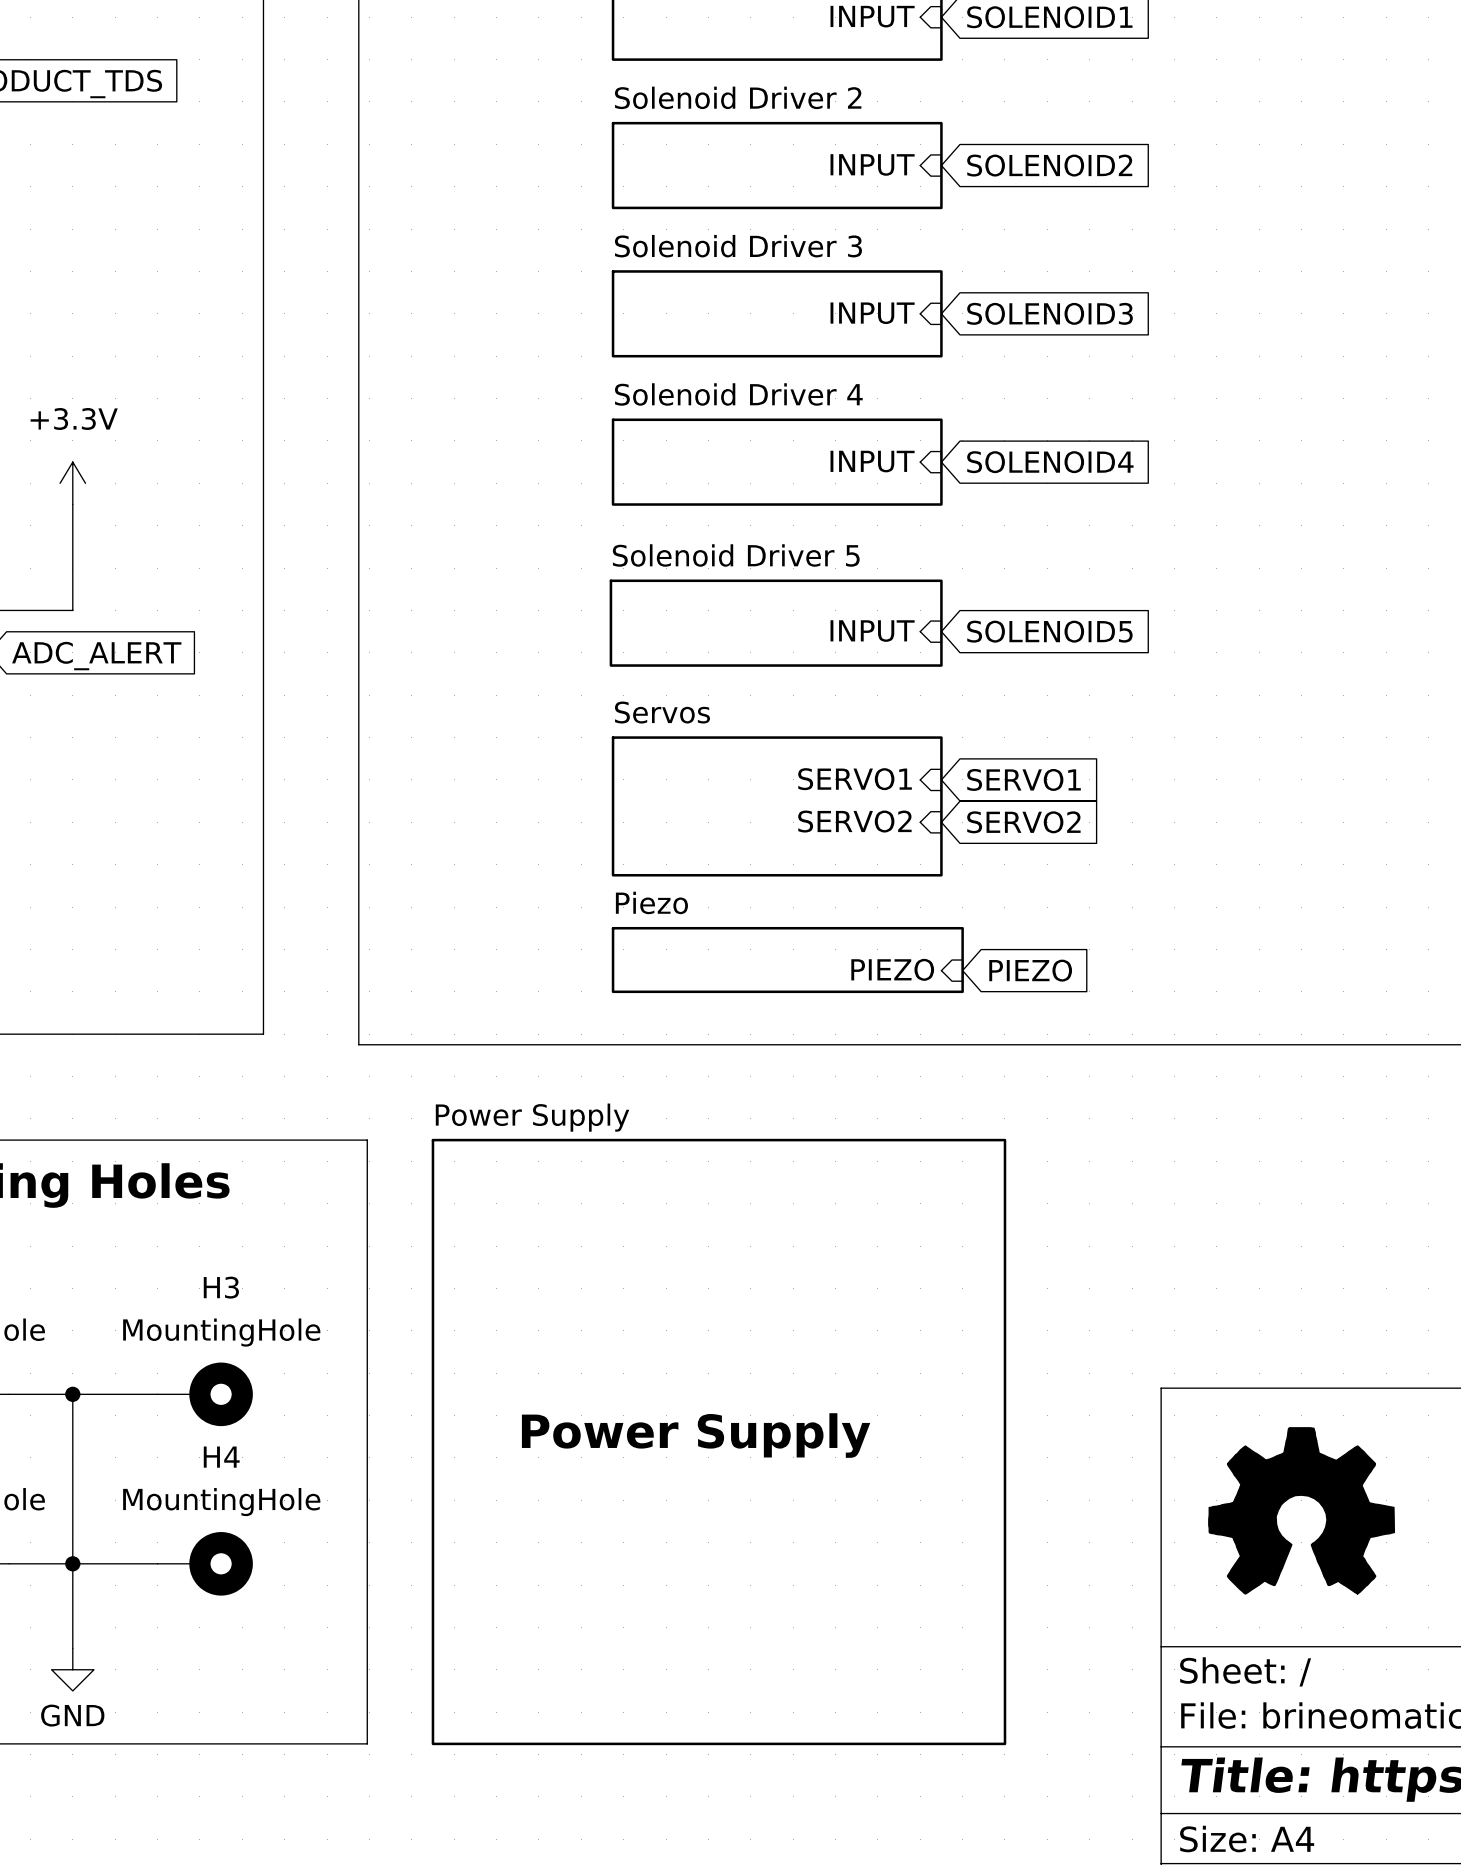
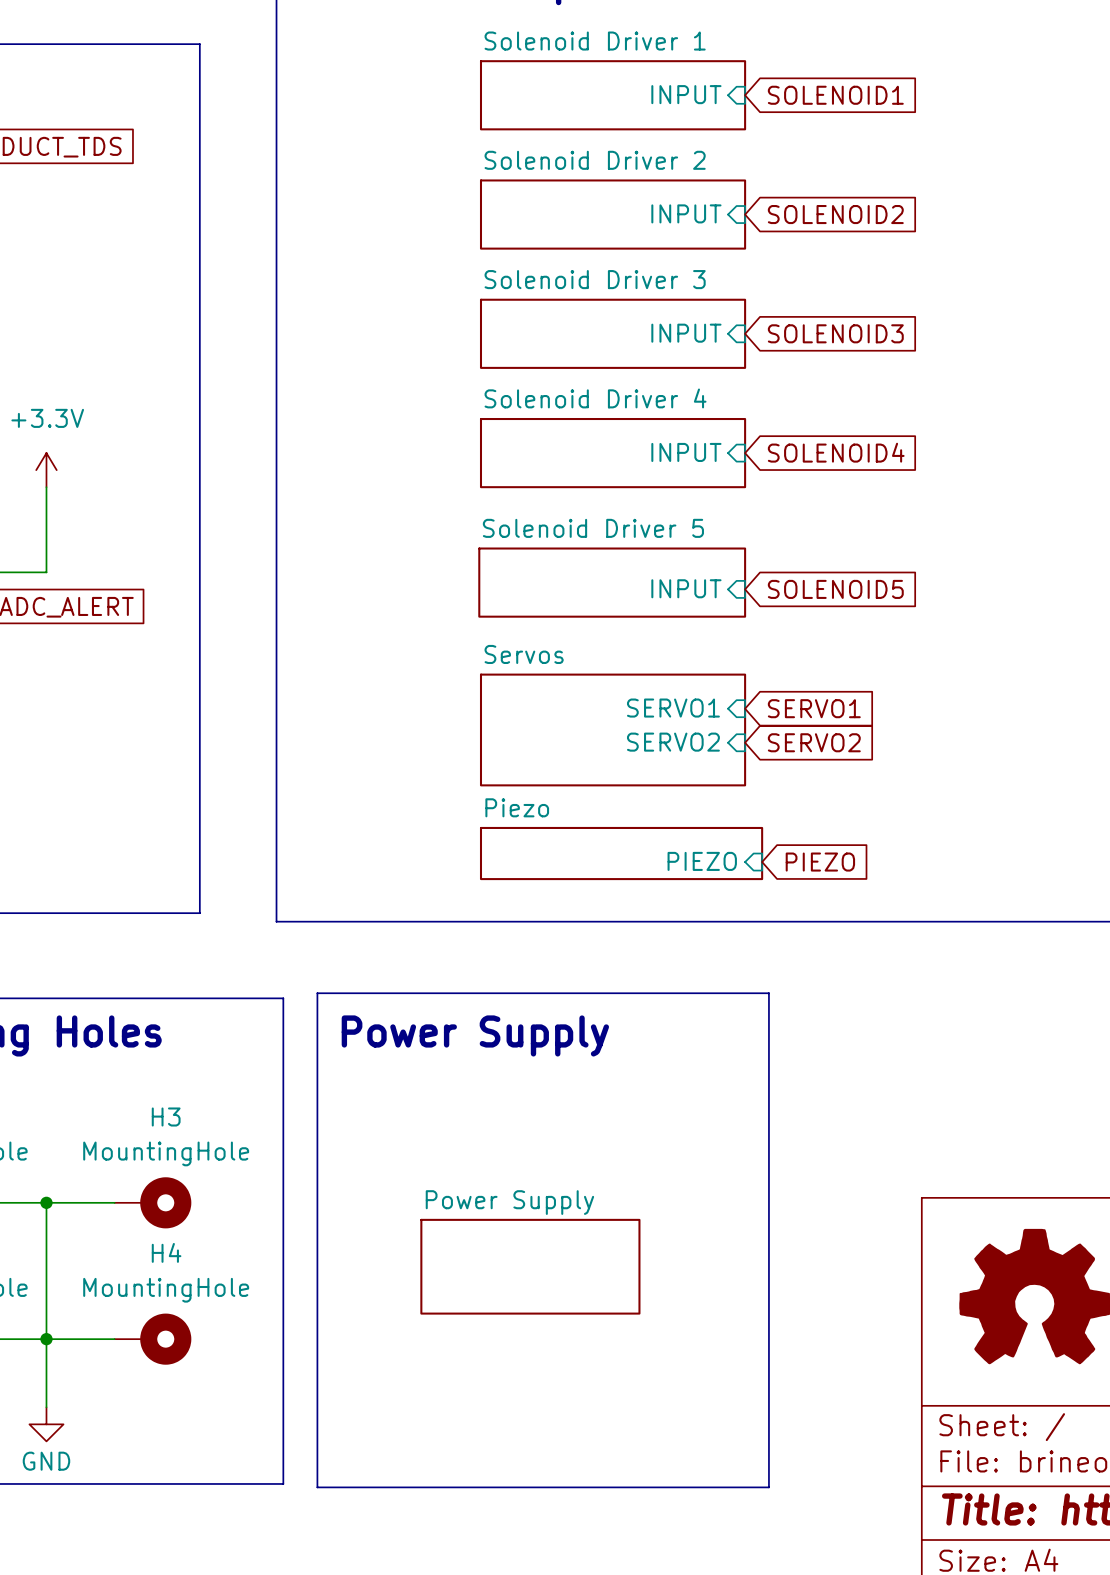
line: none -> (317, 993) (768, 993) (768, 1487) (317, 1487) (317, 993)
text position: Power Supply (696, 1435) -> Power Supply (475, 1035)
sheet Power Supply: (718, 1442) -> none
sheet Power Supply: none -> (530, 1266)

